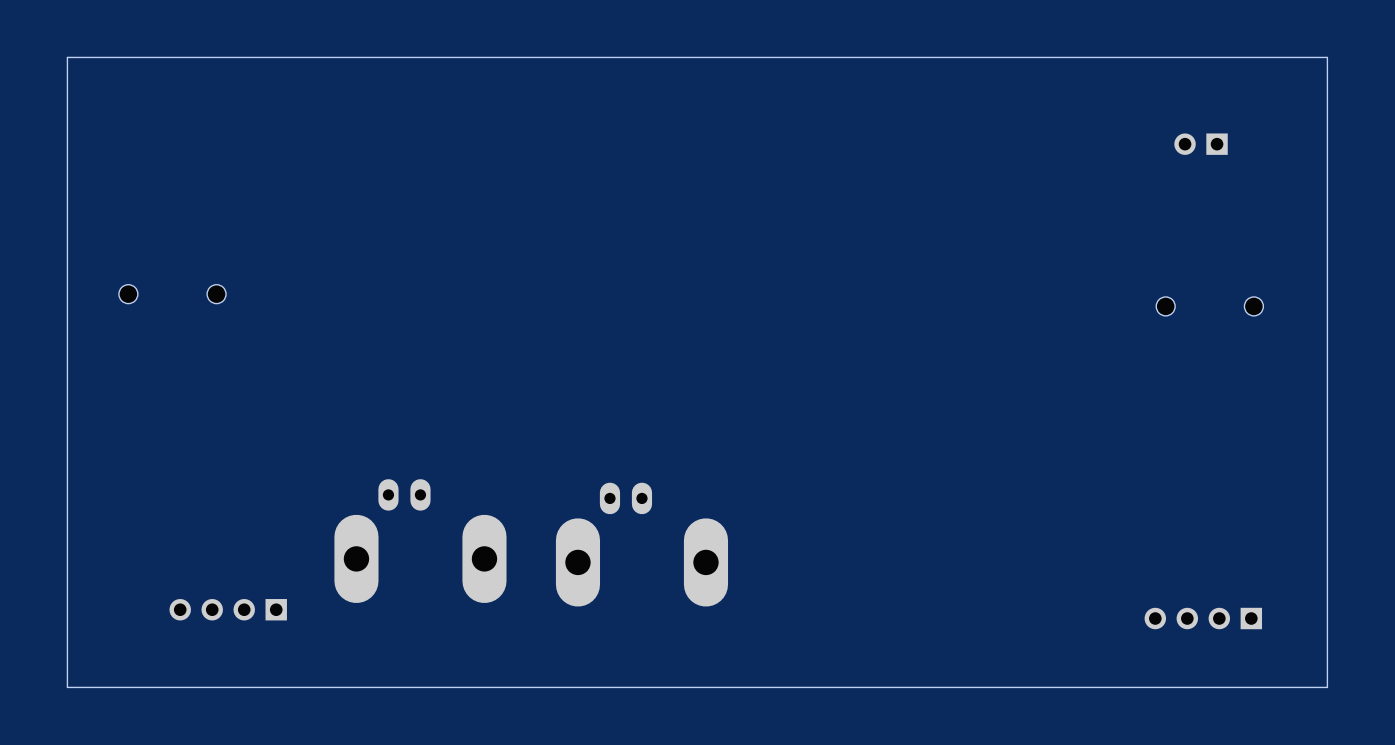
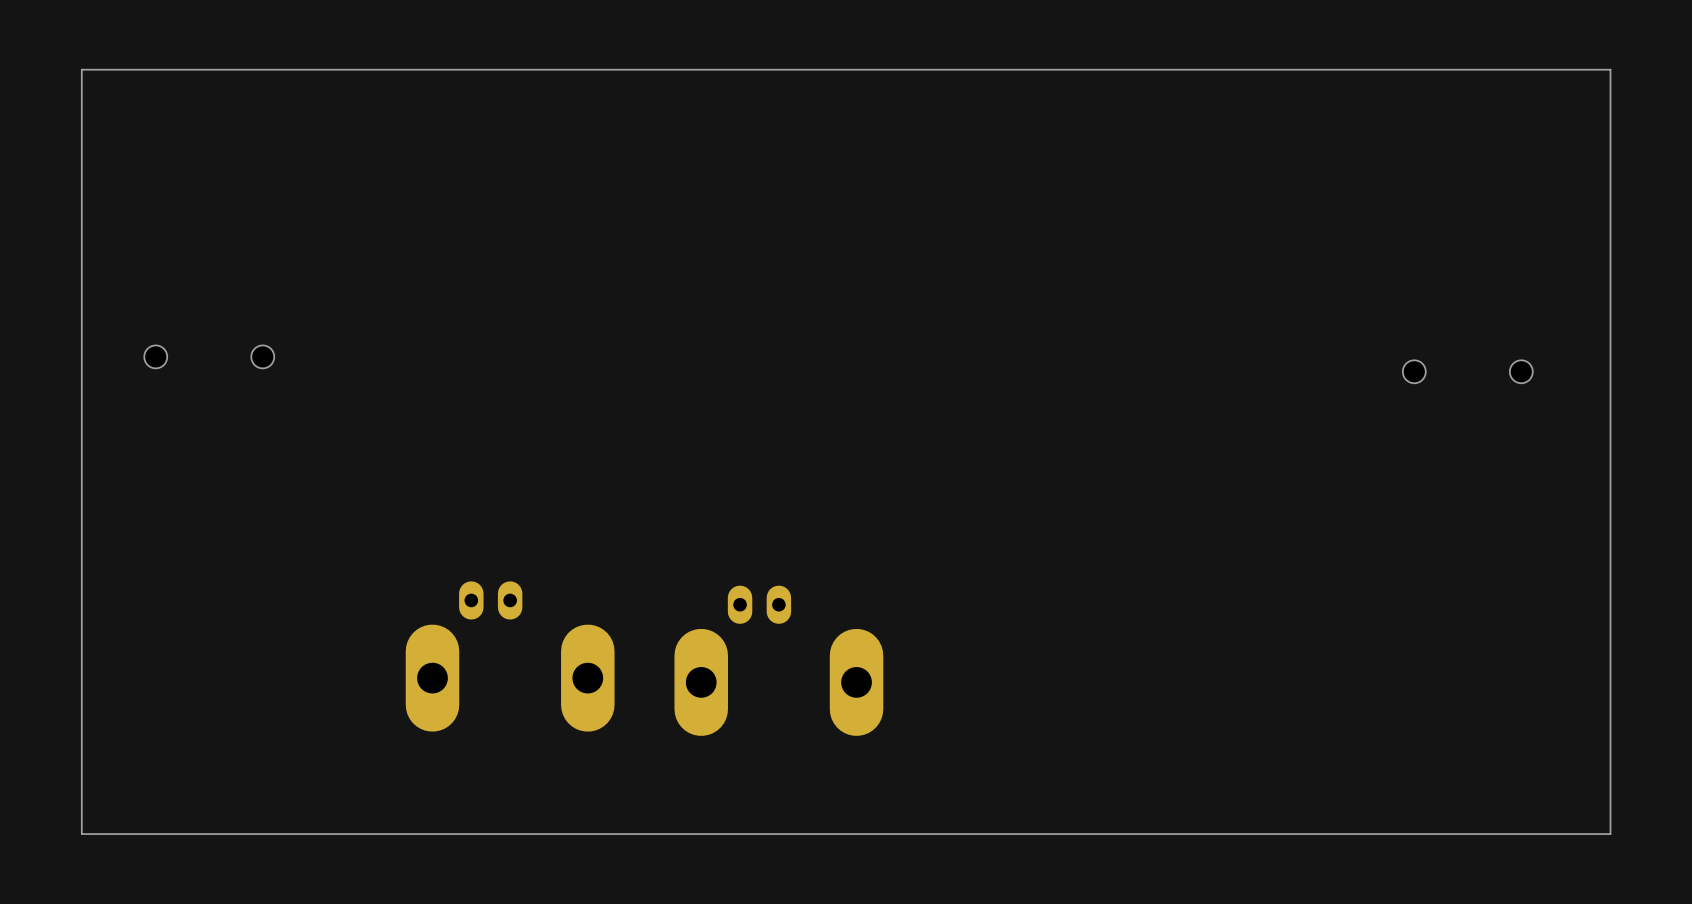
part: (1201, 144) -> none
part: (228, 609) -> none
part: (1203, 618) -> none

